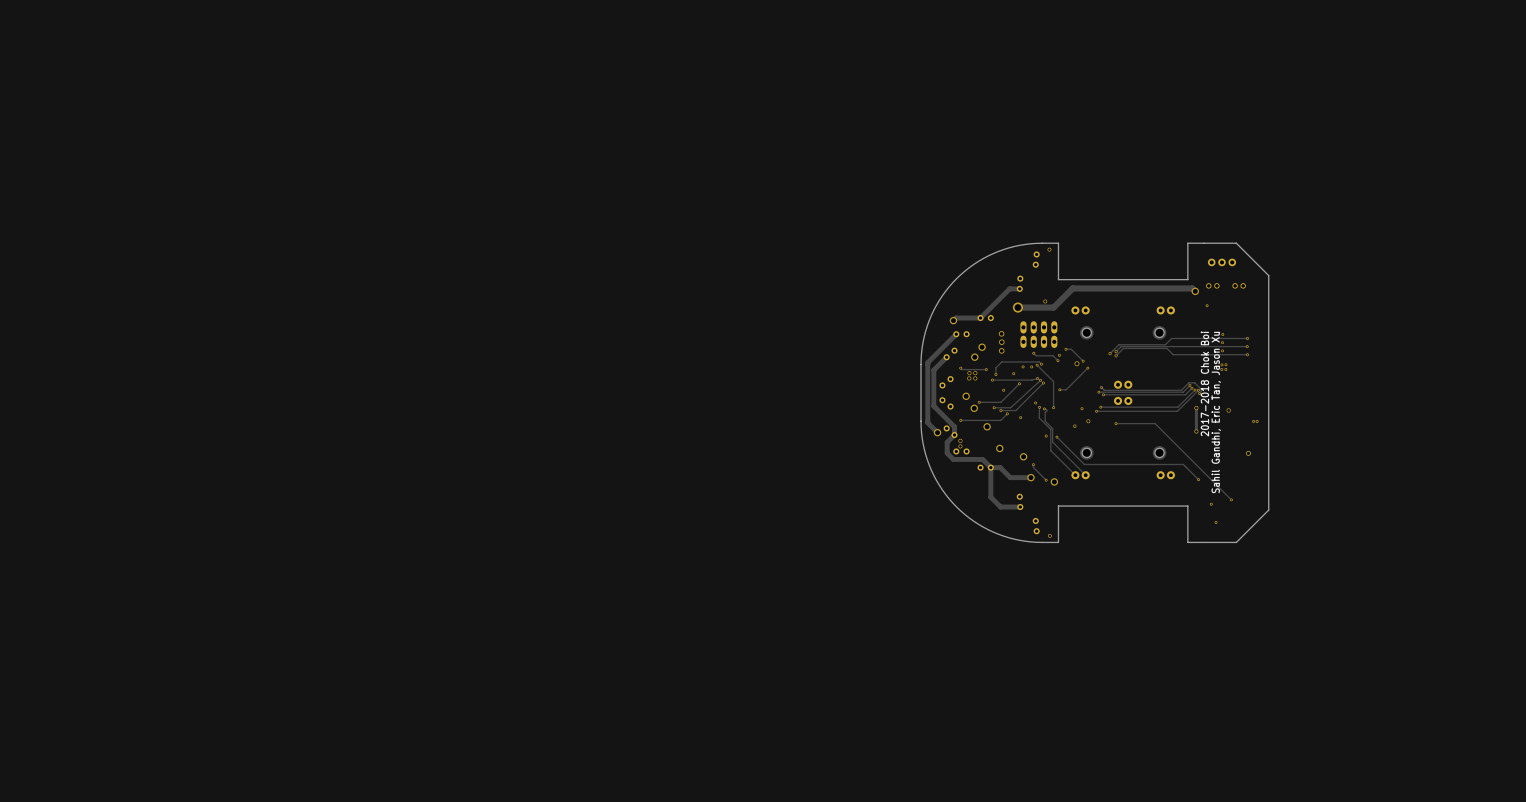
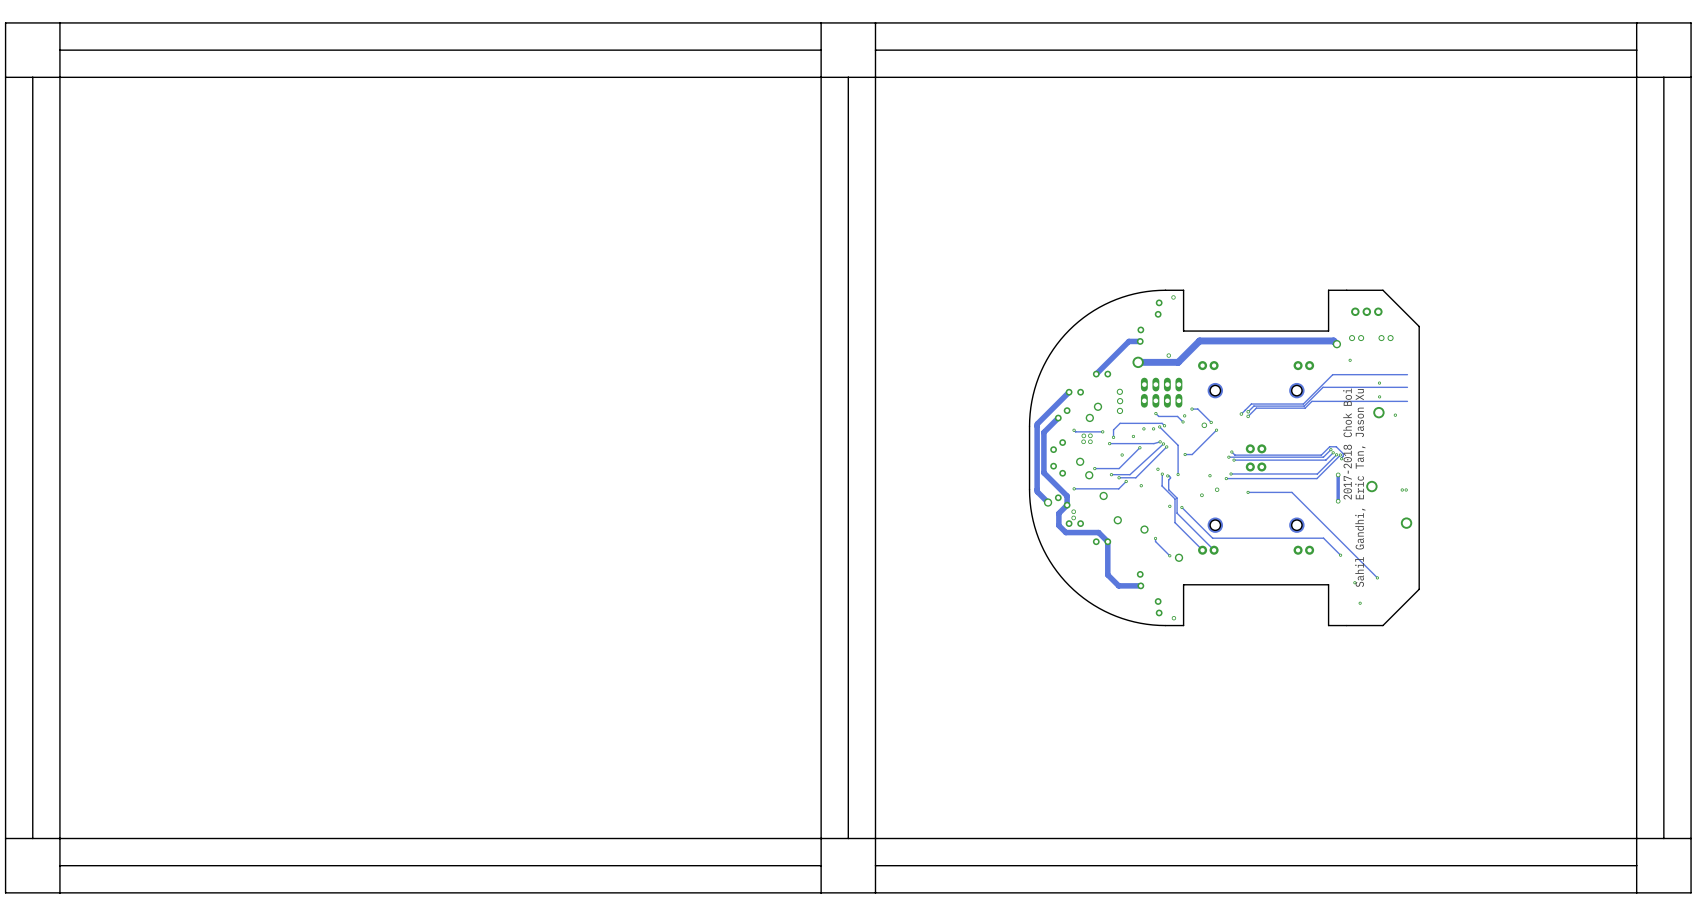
board edge: none -> (59, 22) (59, 892)
board edge: none -> (821, 22) (821, 892)
board edge: none -> (875, 22) (875, 892)
board edge: none -> (1636, 22) (1636, 892)
board edge: none -> (1691, 22) (1691, 892) (5, 892) (5, 22) (1691, 22)
board edge: none -> (821, 50) (59, 50)
board edge: none -> (1636, 50) (875, 50)
board edge: none -> (32, 77) (32, 838)
board edge: none -> (848, 77) (848, 838)
board edge: none -> (1663, 77) (1663, 838)
board edge: none -> (1691, 77) (5, 77)
track: (980, 318) (956, 318) (953, 320) -> none
via: (953, 320) -> none
via: none -> (1379, 383)
via: (1222, 334) -> none
via: none -> (1379, 396)
track: (1247, 338) (1171, 338) -> (1407, 374) (1332, 374) (1310, 397)
via: (1247, 338) -> none
via: (1222, 342) -> none
track: (1247, 346) (1166, 346) -> (1407, 387) (1323, 387) (1304, 406)
via: (1247, 346) -> none
track: (1166, 348) (1173, 354) (1247, 354) -> (1305, 408) (1311, 401) (1407, 401)
via: (1222, 350) -> none
via: none -> (1378, 412)
via: (1221, 364) -> none
via: (1225, 364) -> none
via: (1221, 369) -> none
via: (1225, 369) -> none
via: (1228, 410) -> none
via: none -> (1371, 486)
via: none -> (1406, 523)
via: (1248, 453) -> none
track: (990, 467) (1000, 467) (1010, 477) (1030, 477) -> none
via: (1030, 477) -> none
board edge: none -> (1691, 838) (5, 838)
board edge: none -> (821, 865) (59, 865)
board edge: none -> (1636, 865) (875, 865)

